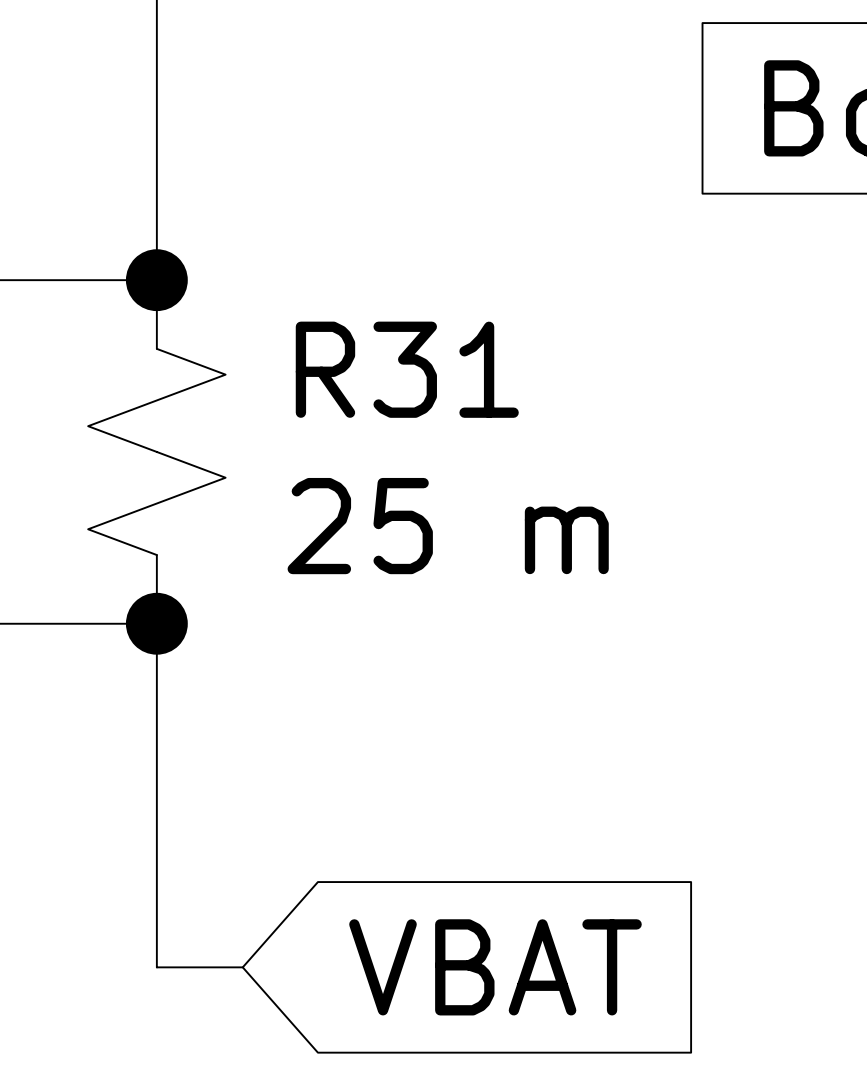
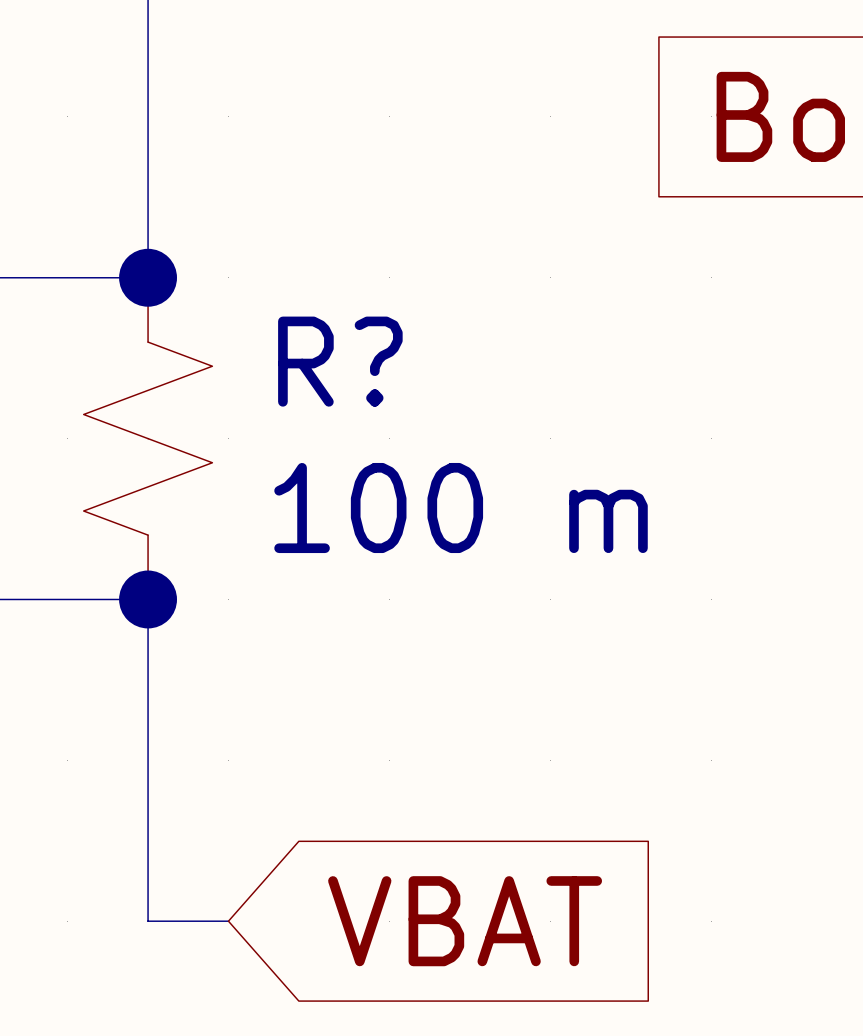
R31 name: R31 (407, 369) -> R? (340, 361)
R31 value: 25 m (448, 526) -> 100 m (461, 508)

